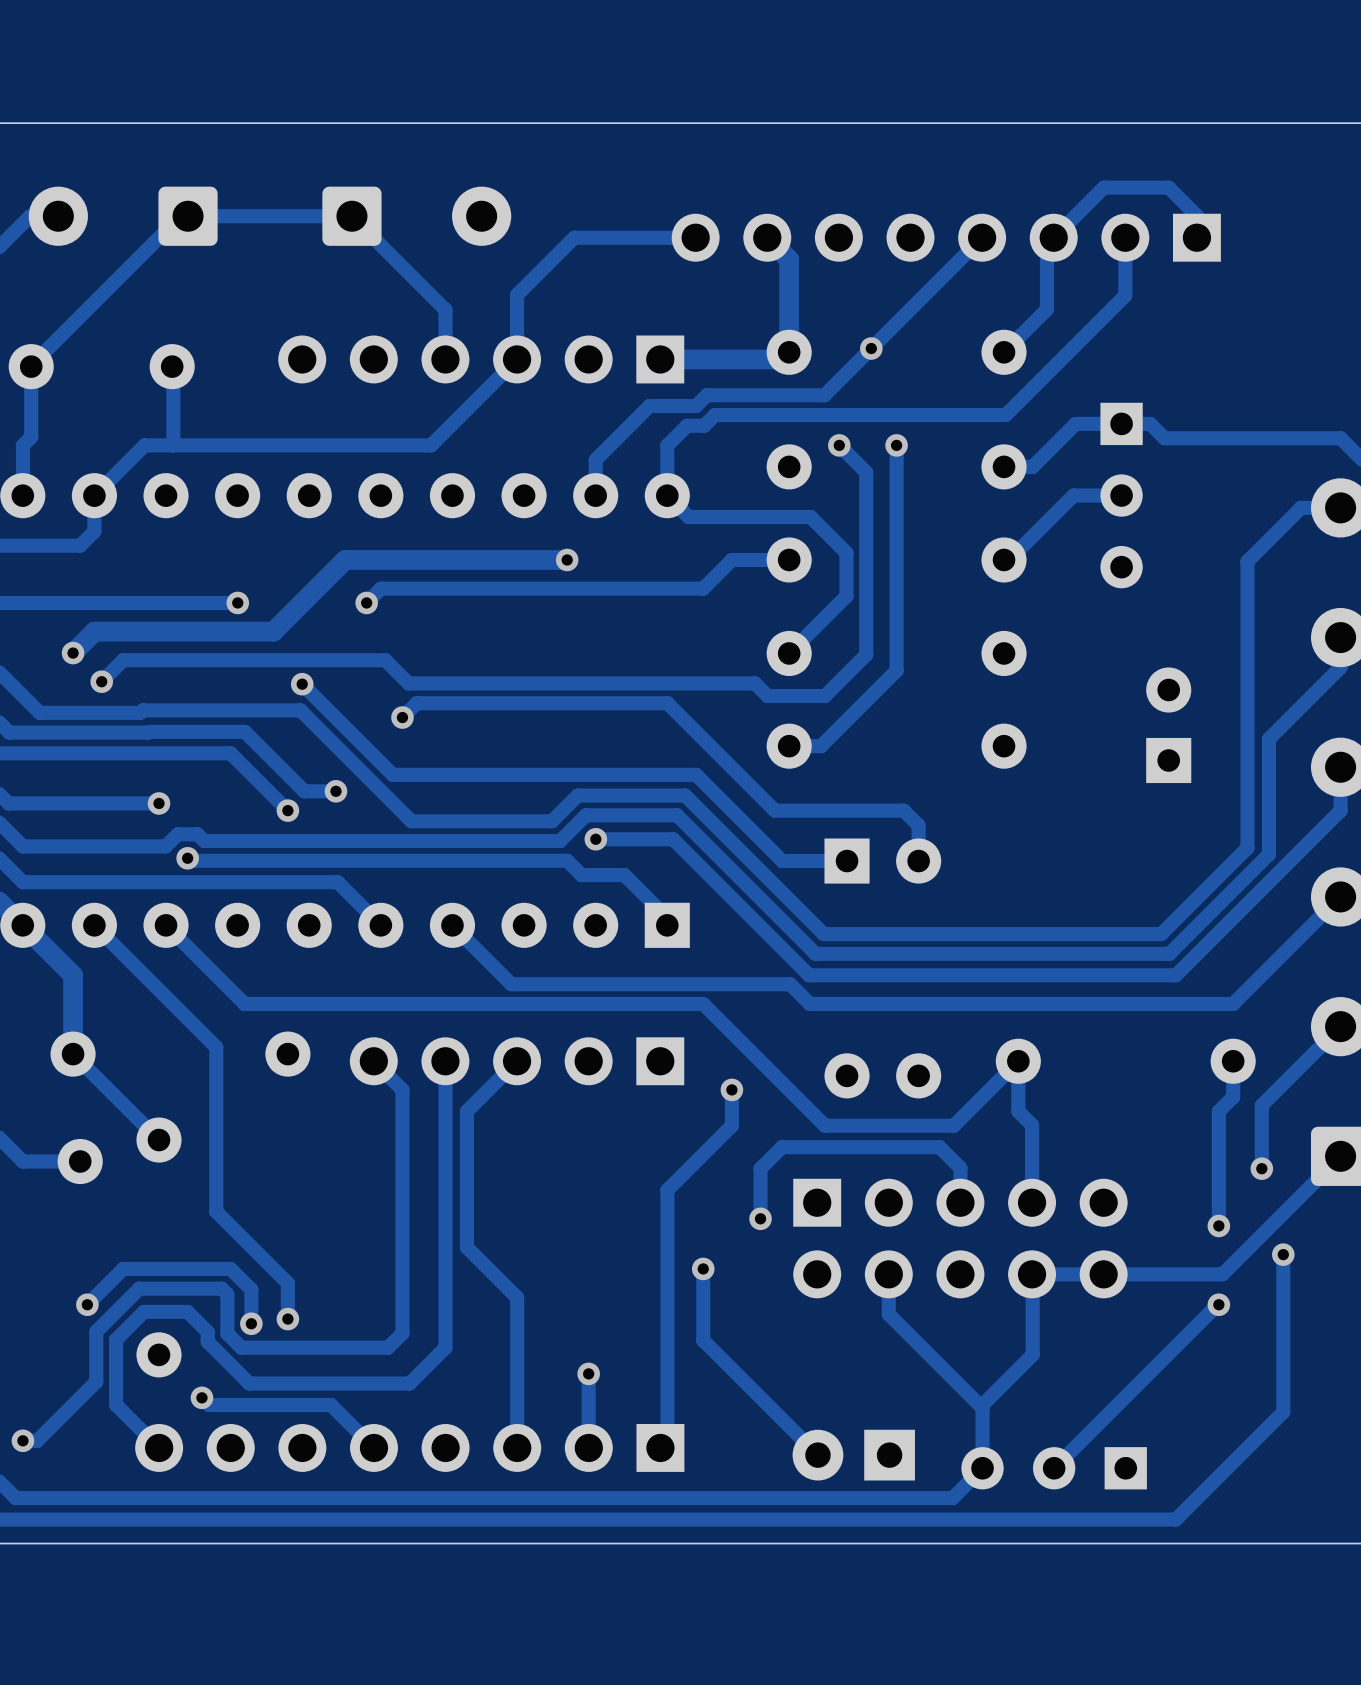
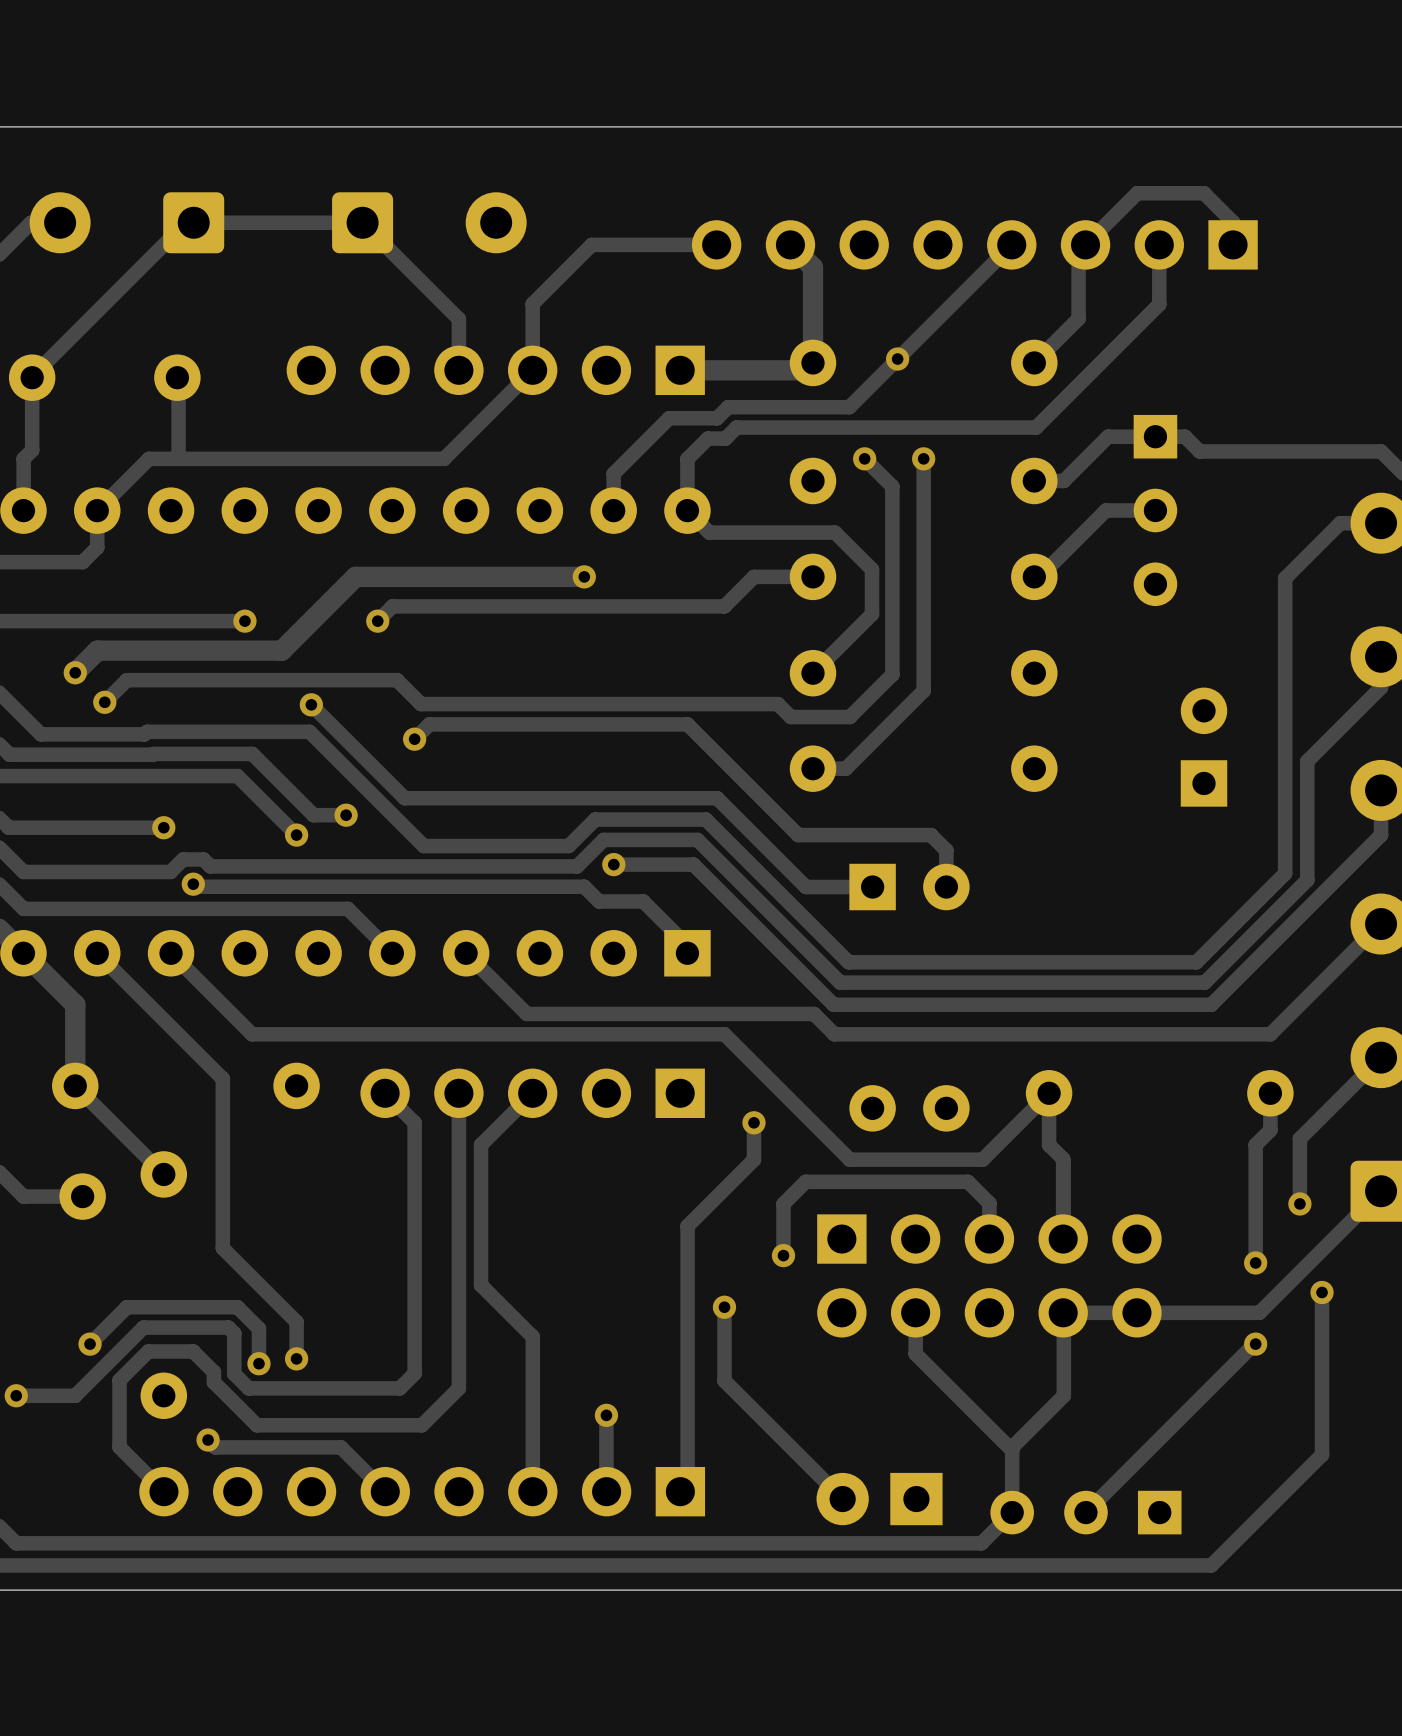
track: (96, 1331) (96, 1381) (37, 1440) (22, 1440) -> (99, 1371) (75, 1395) (16, 1395)
via: none -> (16, 1395)
via: (22, 1440) -> none

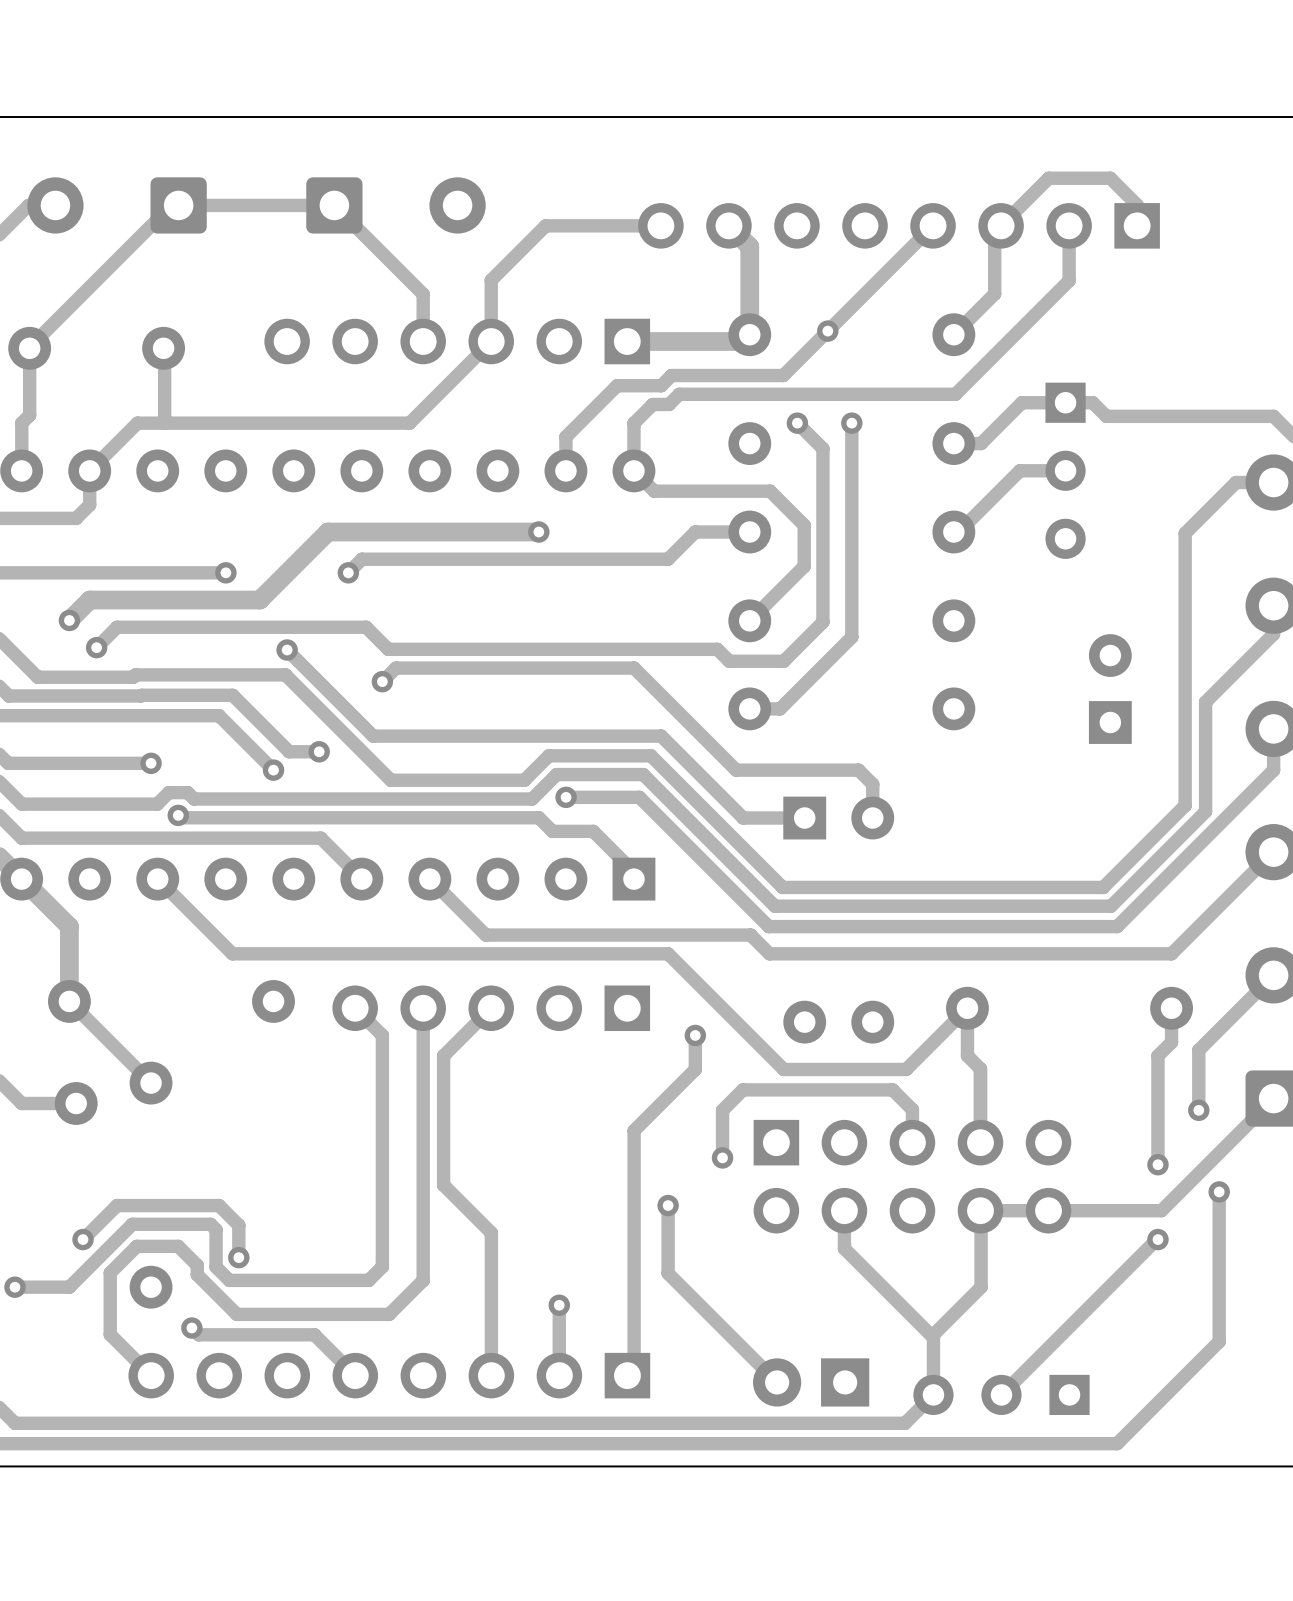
track: (97, 953) (222, 1078) (222, 1248) (296, 1321) (296, 1358) -> none
via: (296, 1358) -> none

